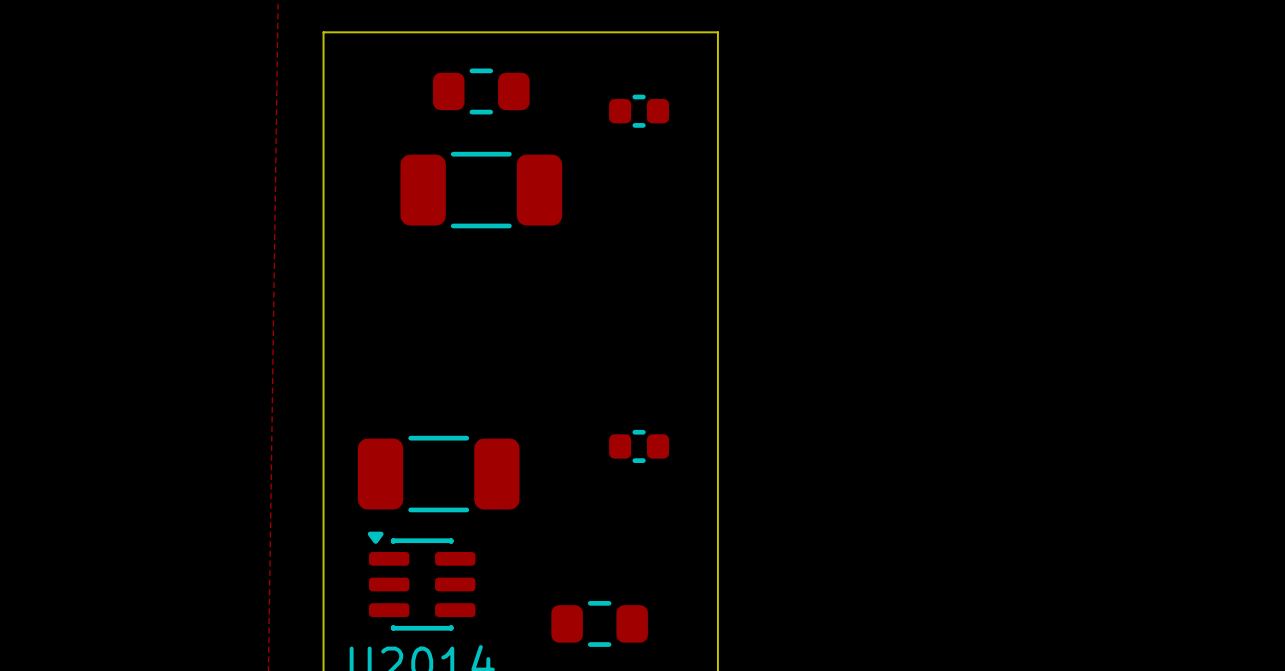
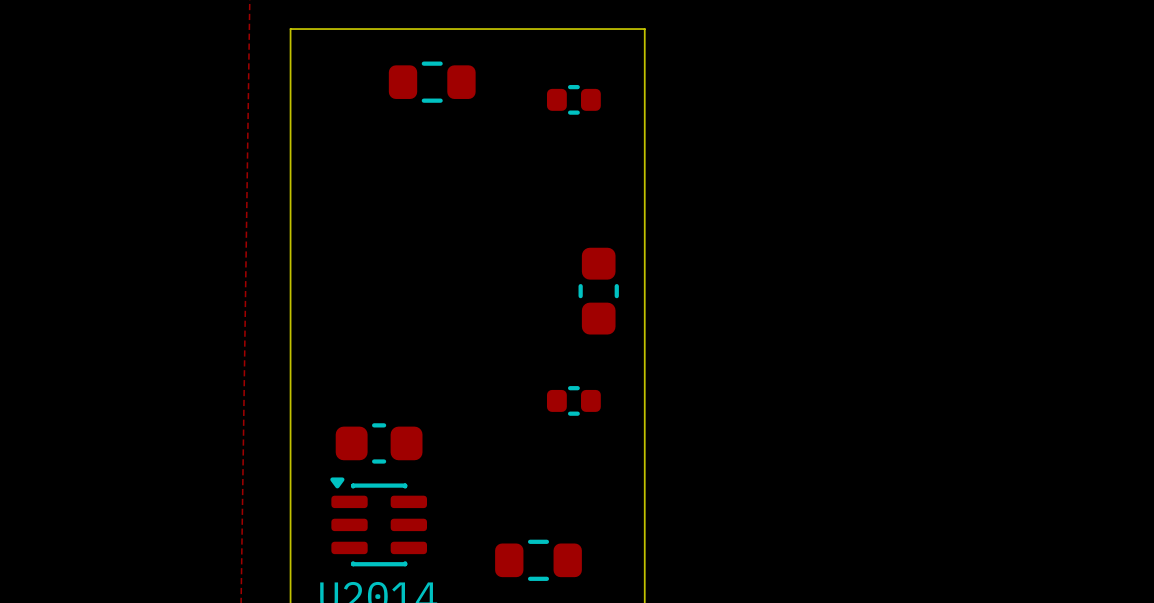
part: (481, 190) -> none
part: none -> (598, 291)
part footprint: [357, 435, 520, 513] -> [335, 423, 423, 464]

